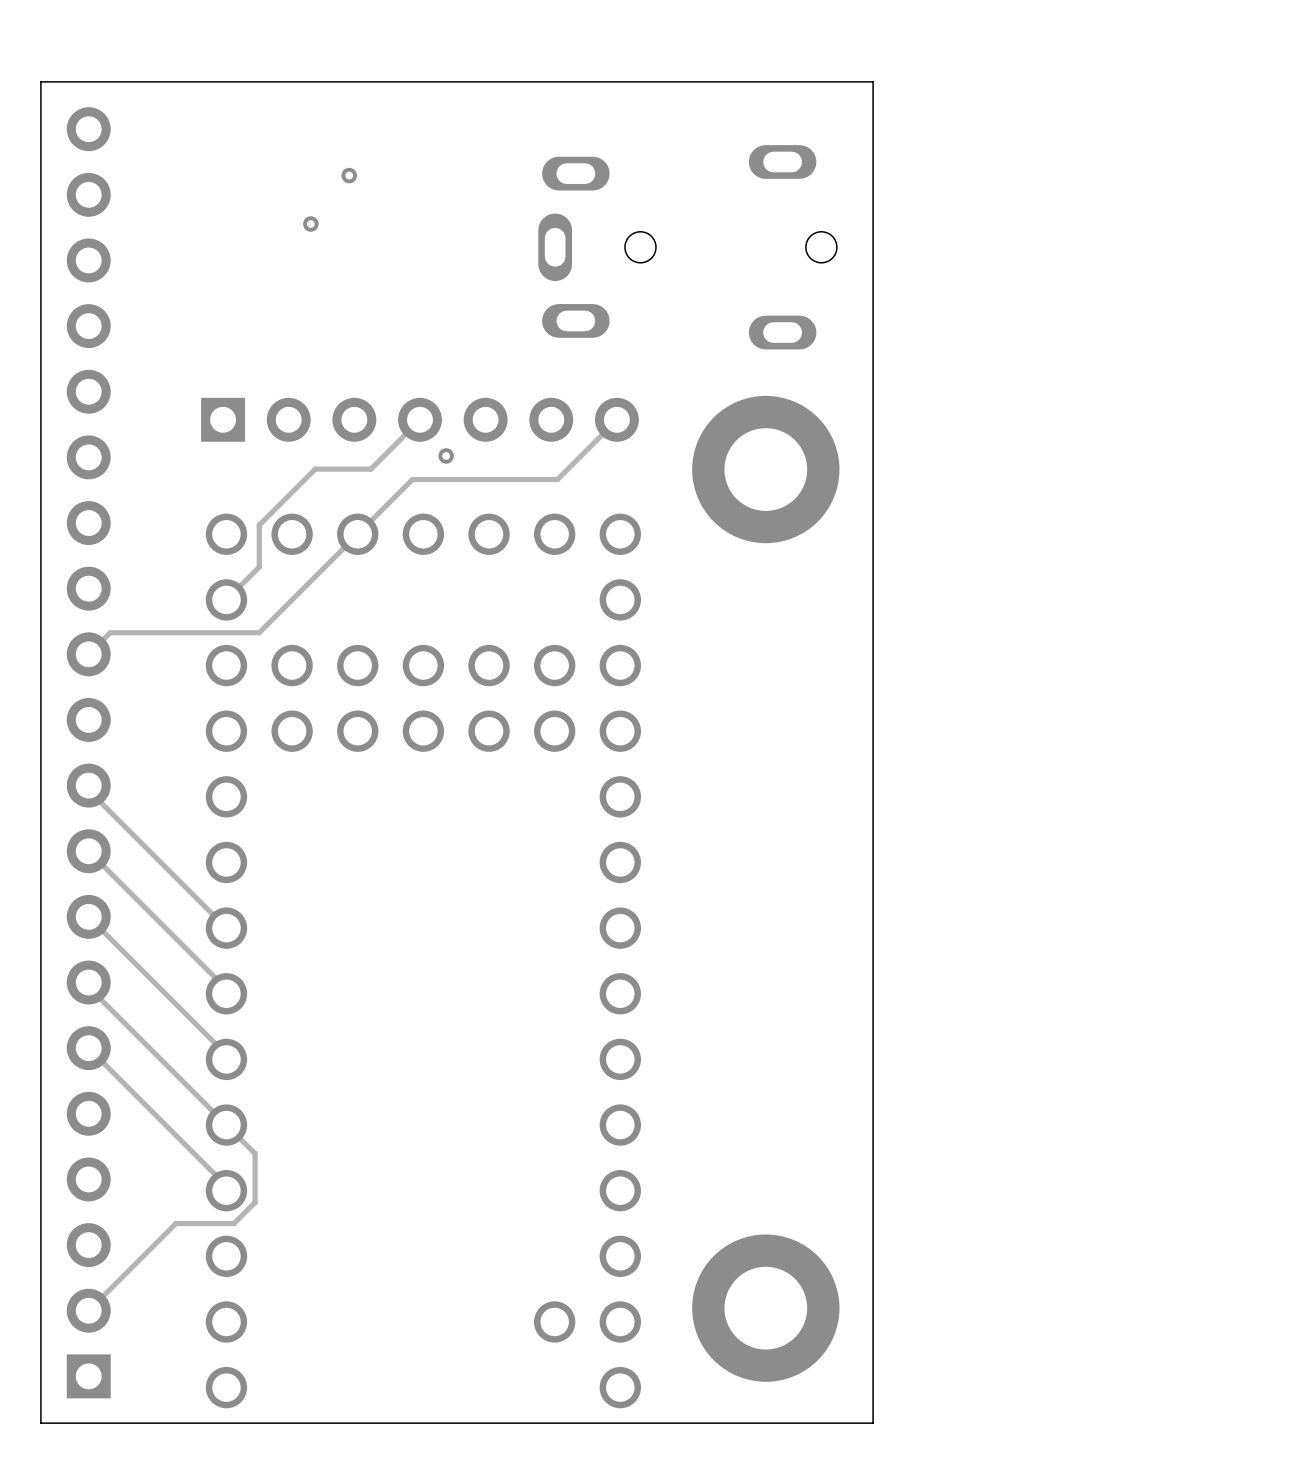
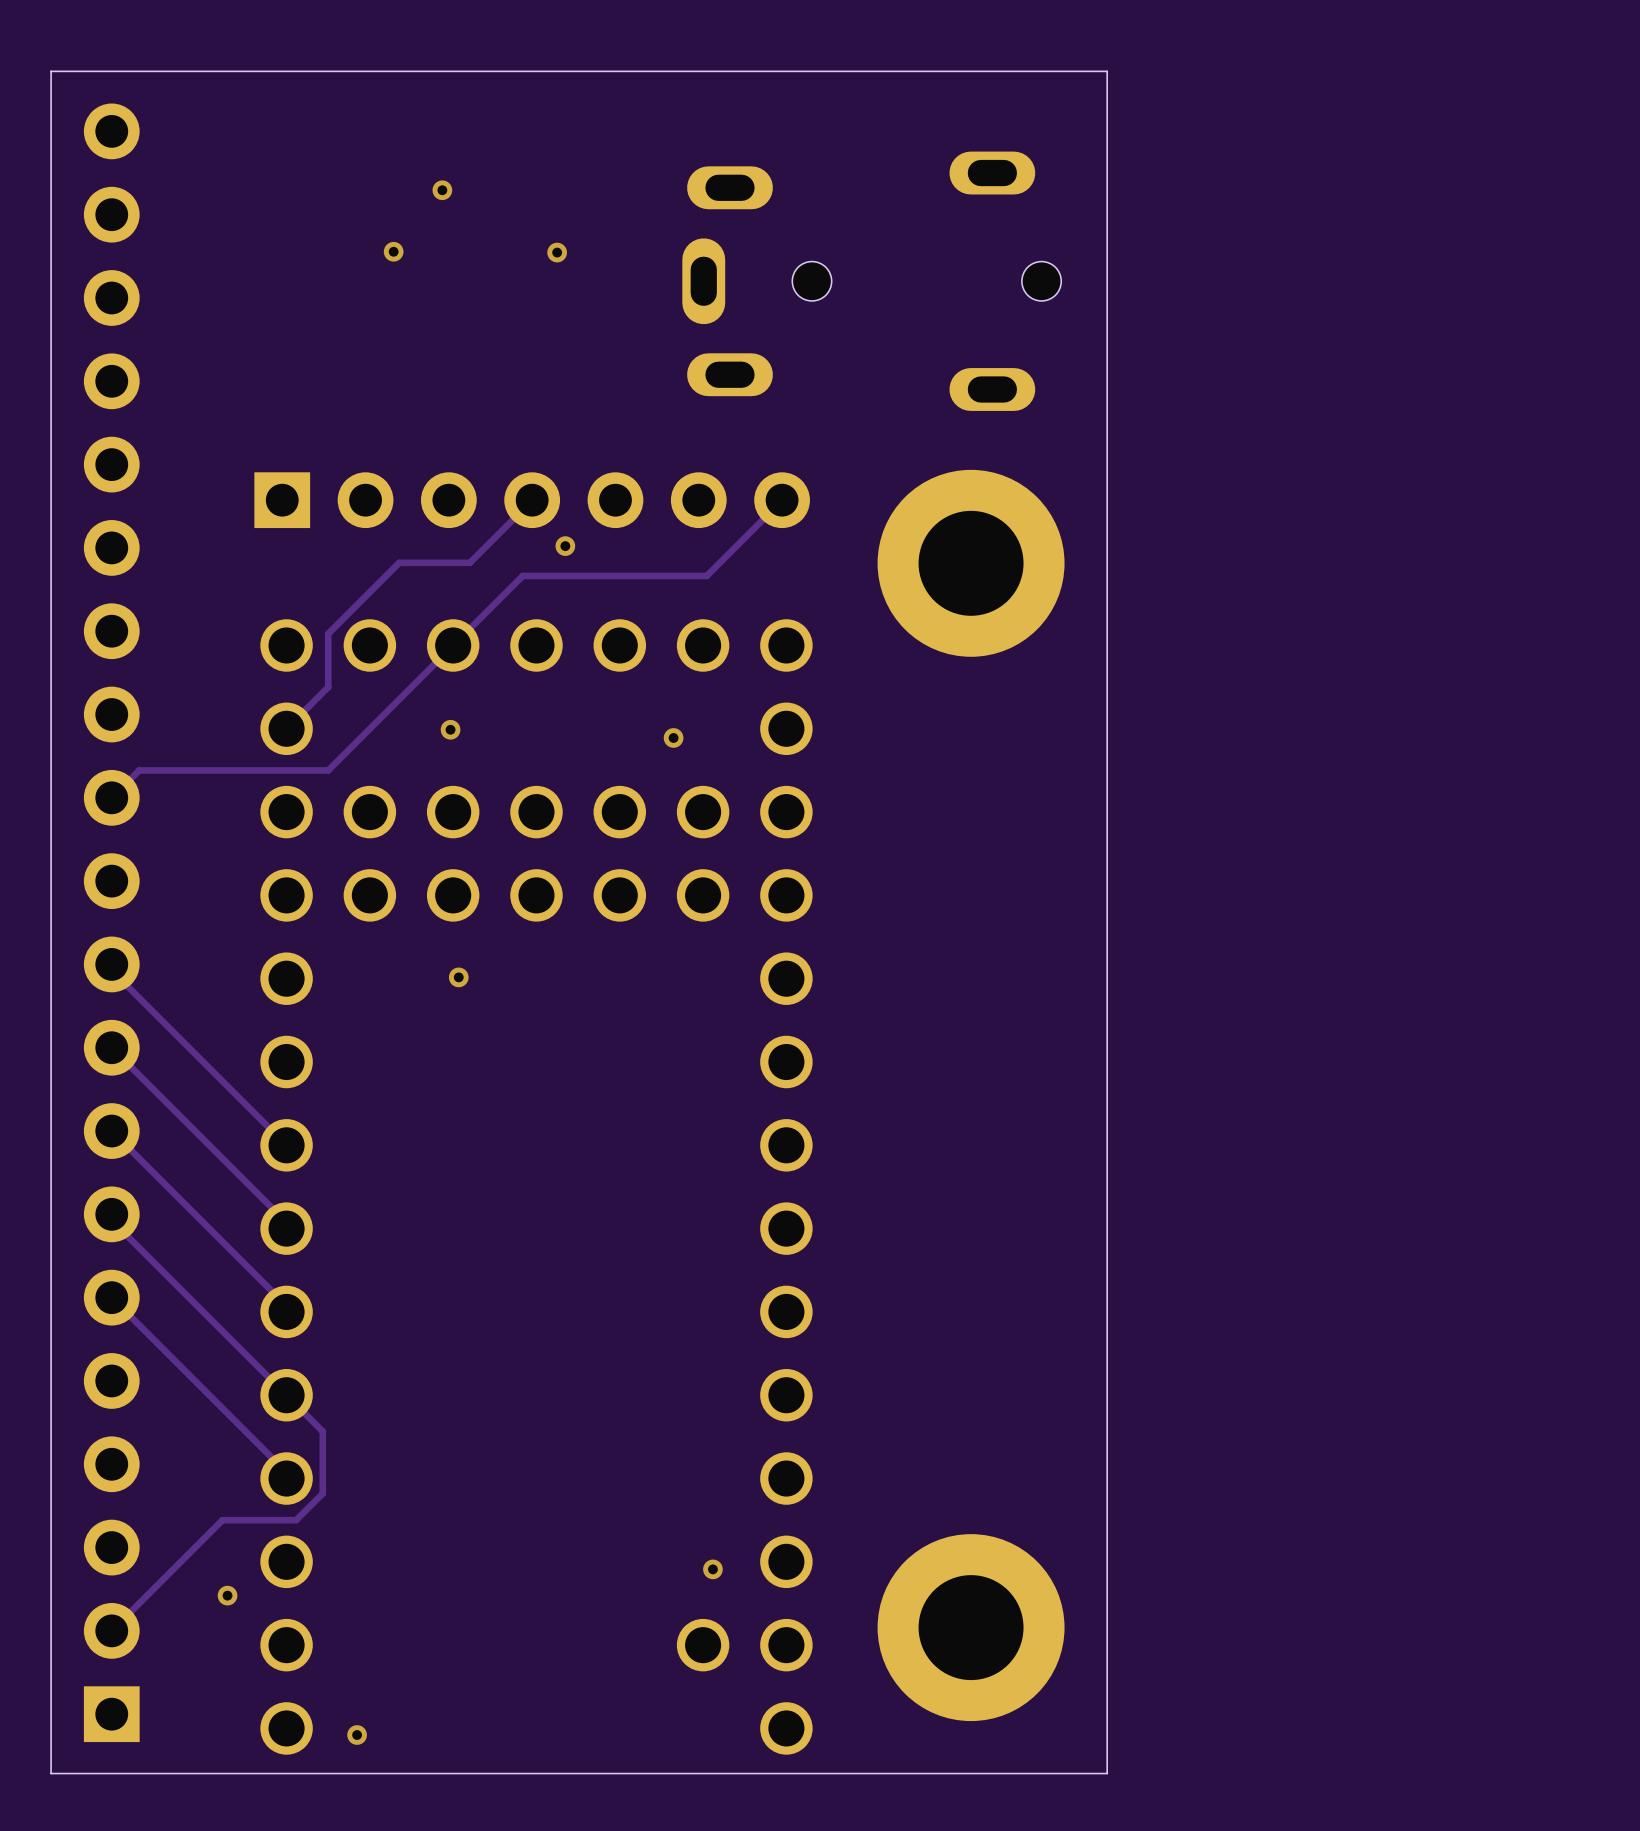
via: none -> (557, 252)
via: none -> (450, 729)
via: none -> (673, 737)
via: none -> (458, 977)
via: none -> (712, 1569)
via: none -> (227, 1595)
via: none -> (357, 1735)

